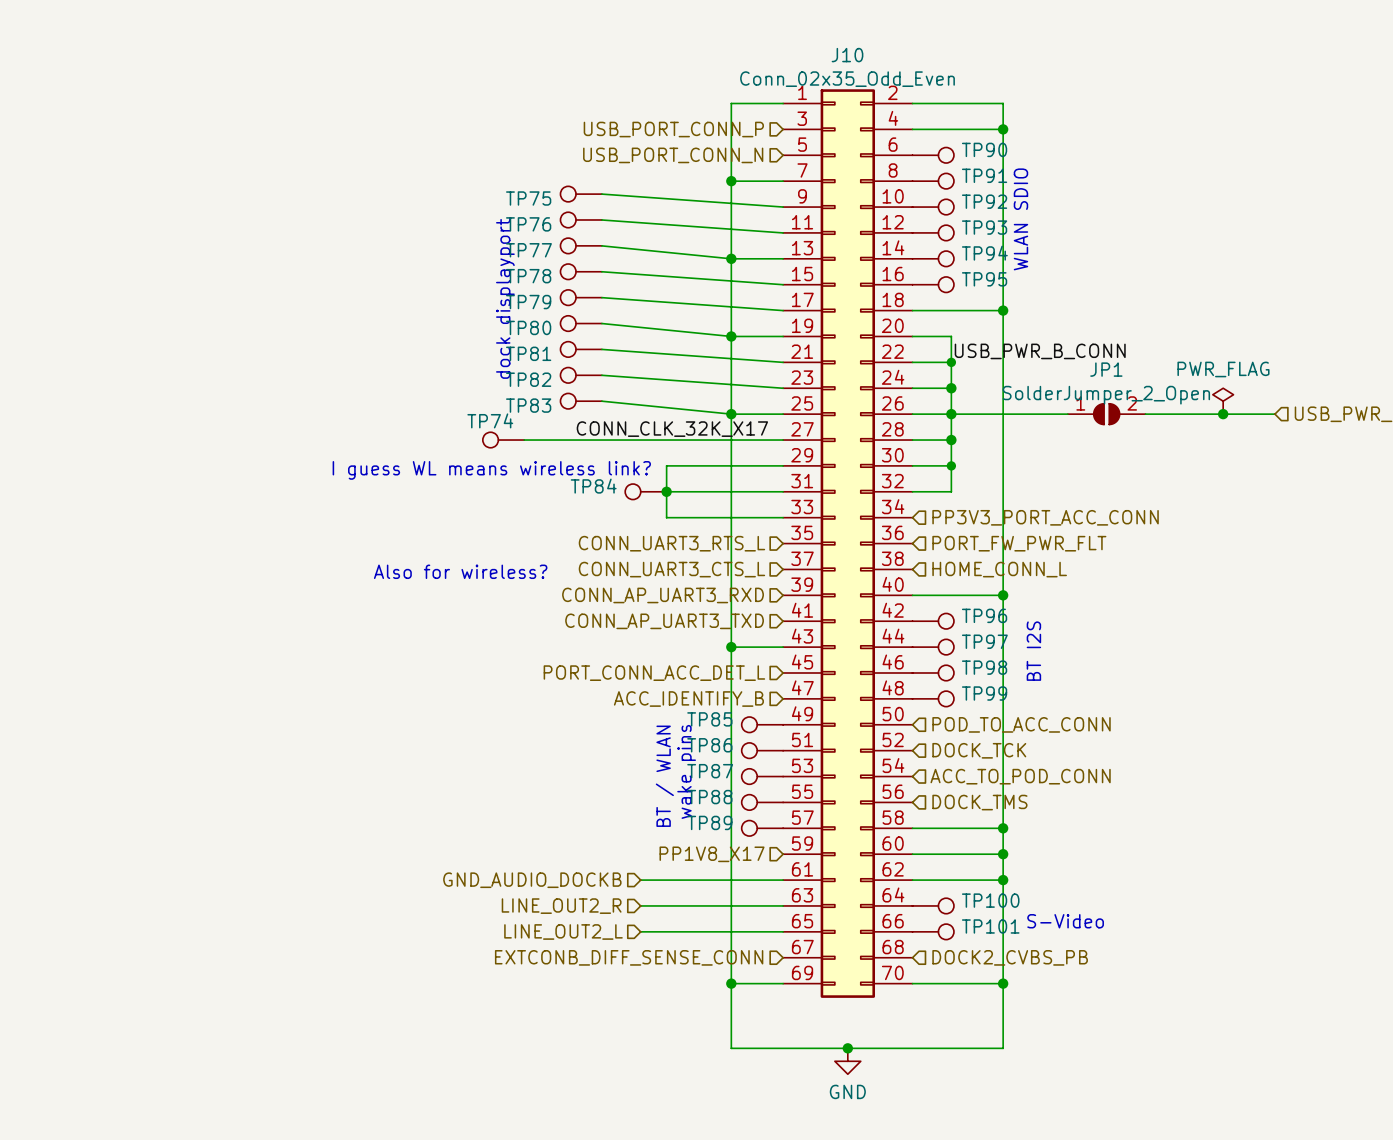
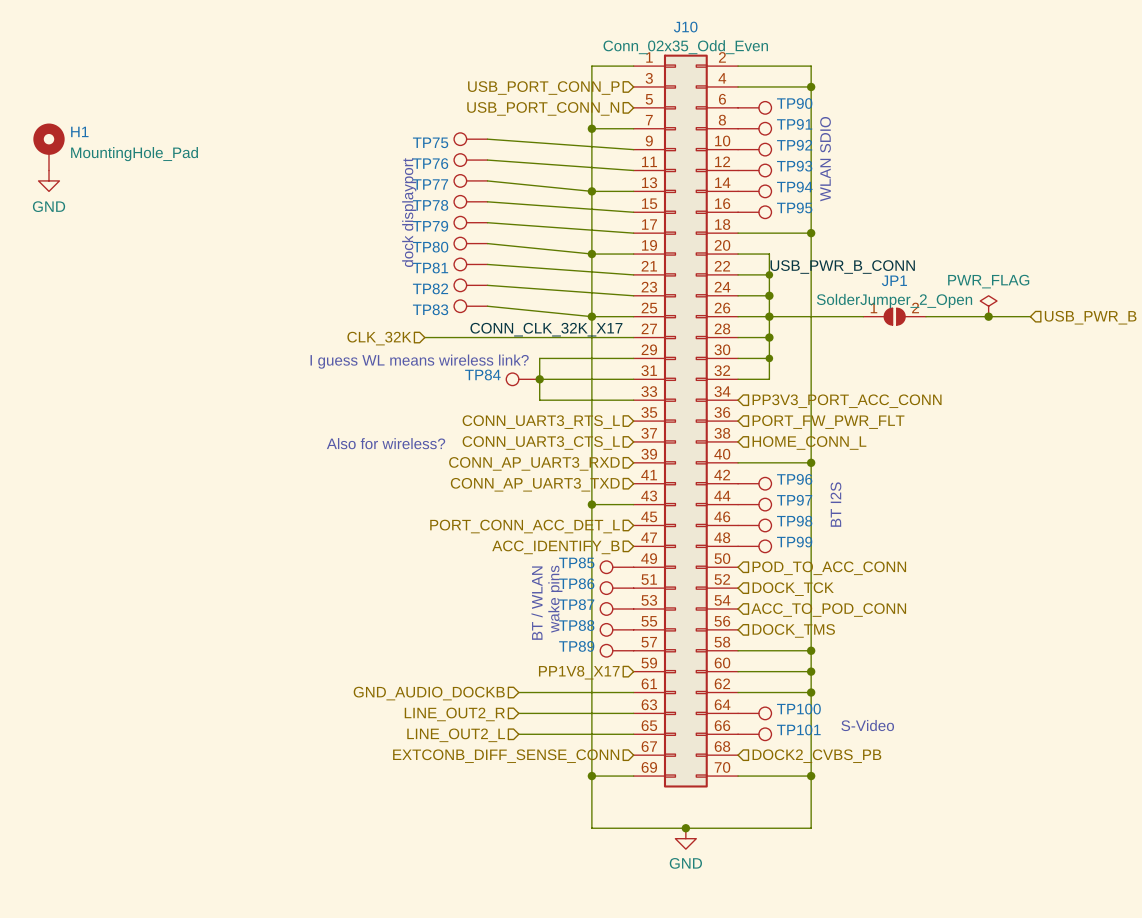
H1: none -> MountingHole_Pad (48, 147)
power symbol: none -> GND (48, 180)
hierarchical label: none -> CLK_32K (379, 338)
TP74: (503, 440) -> none

